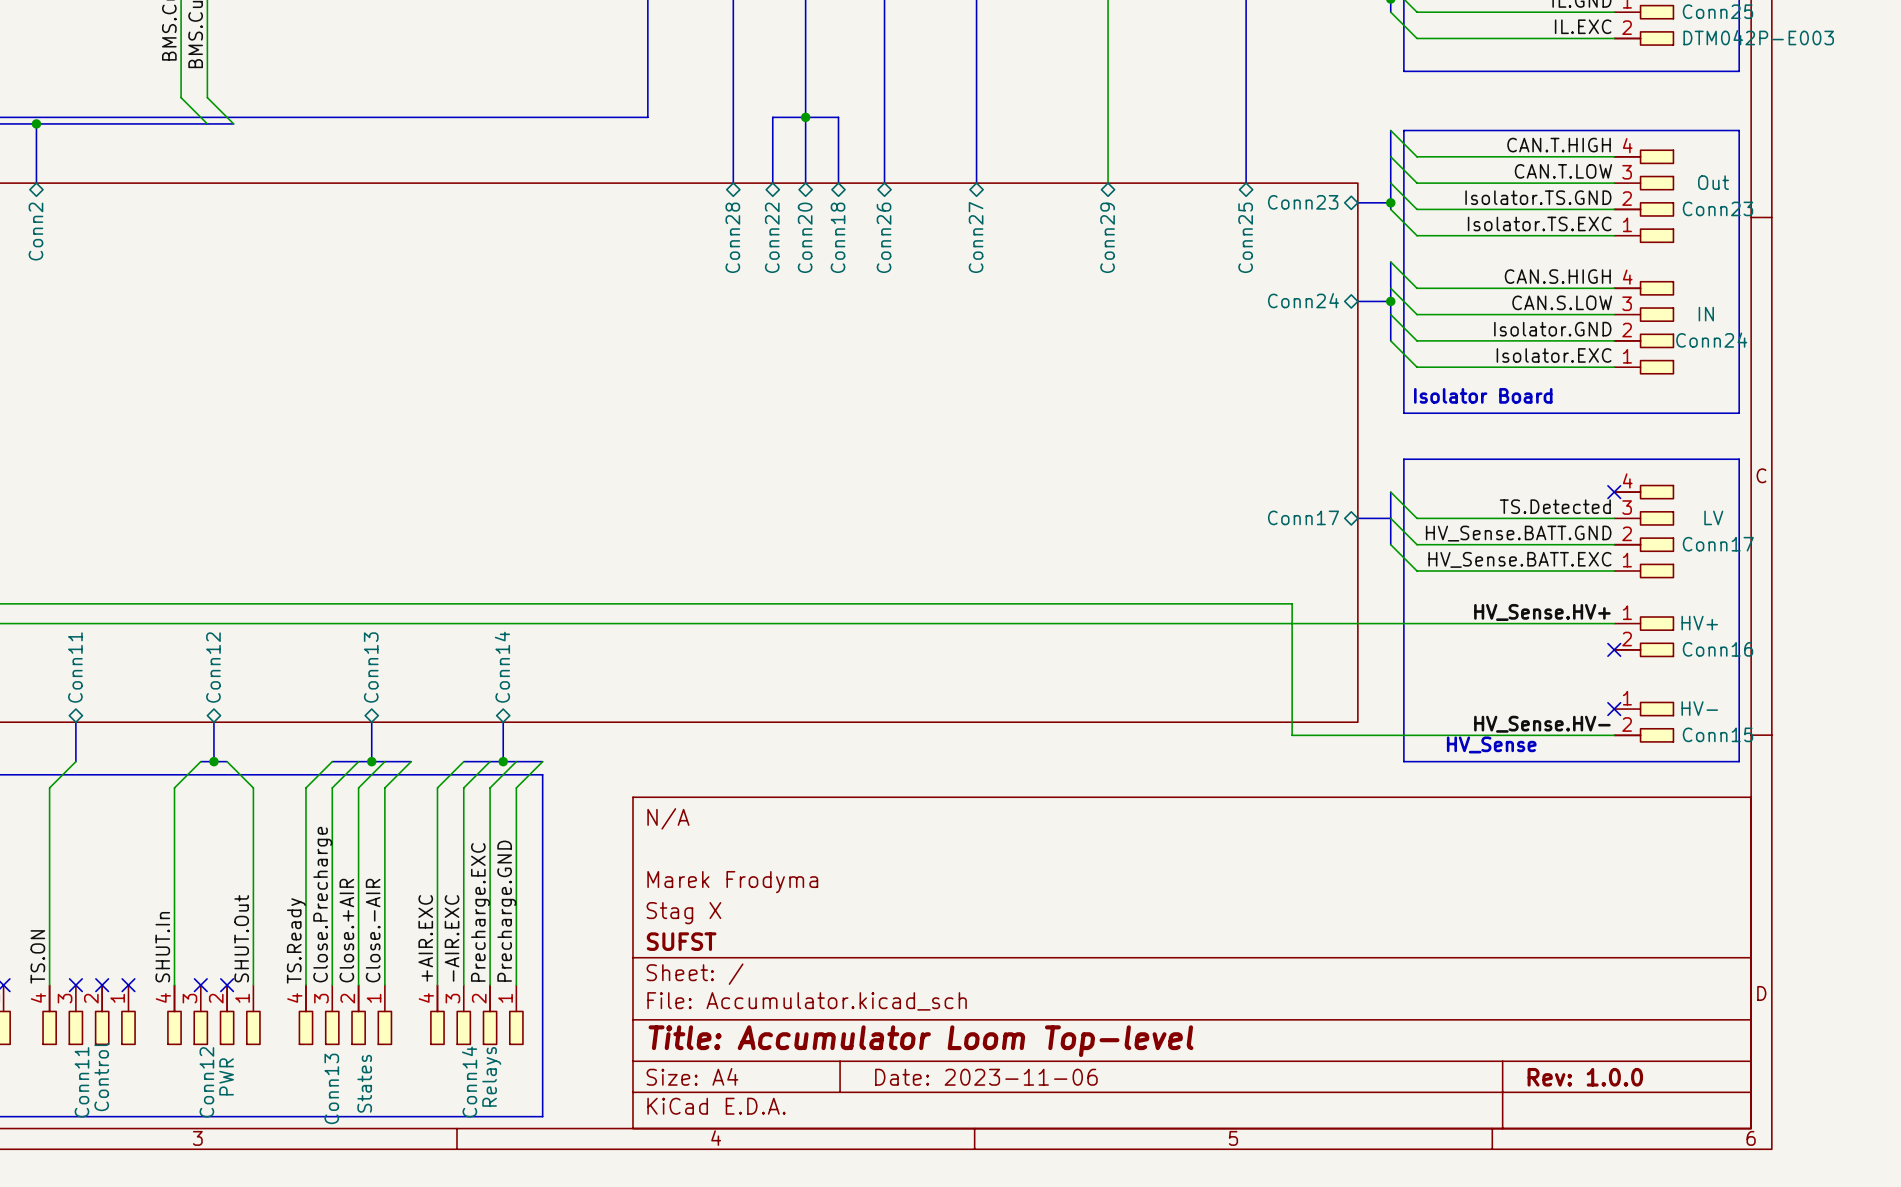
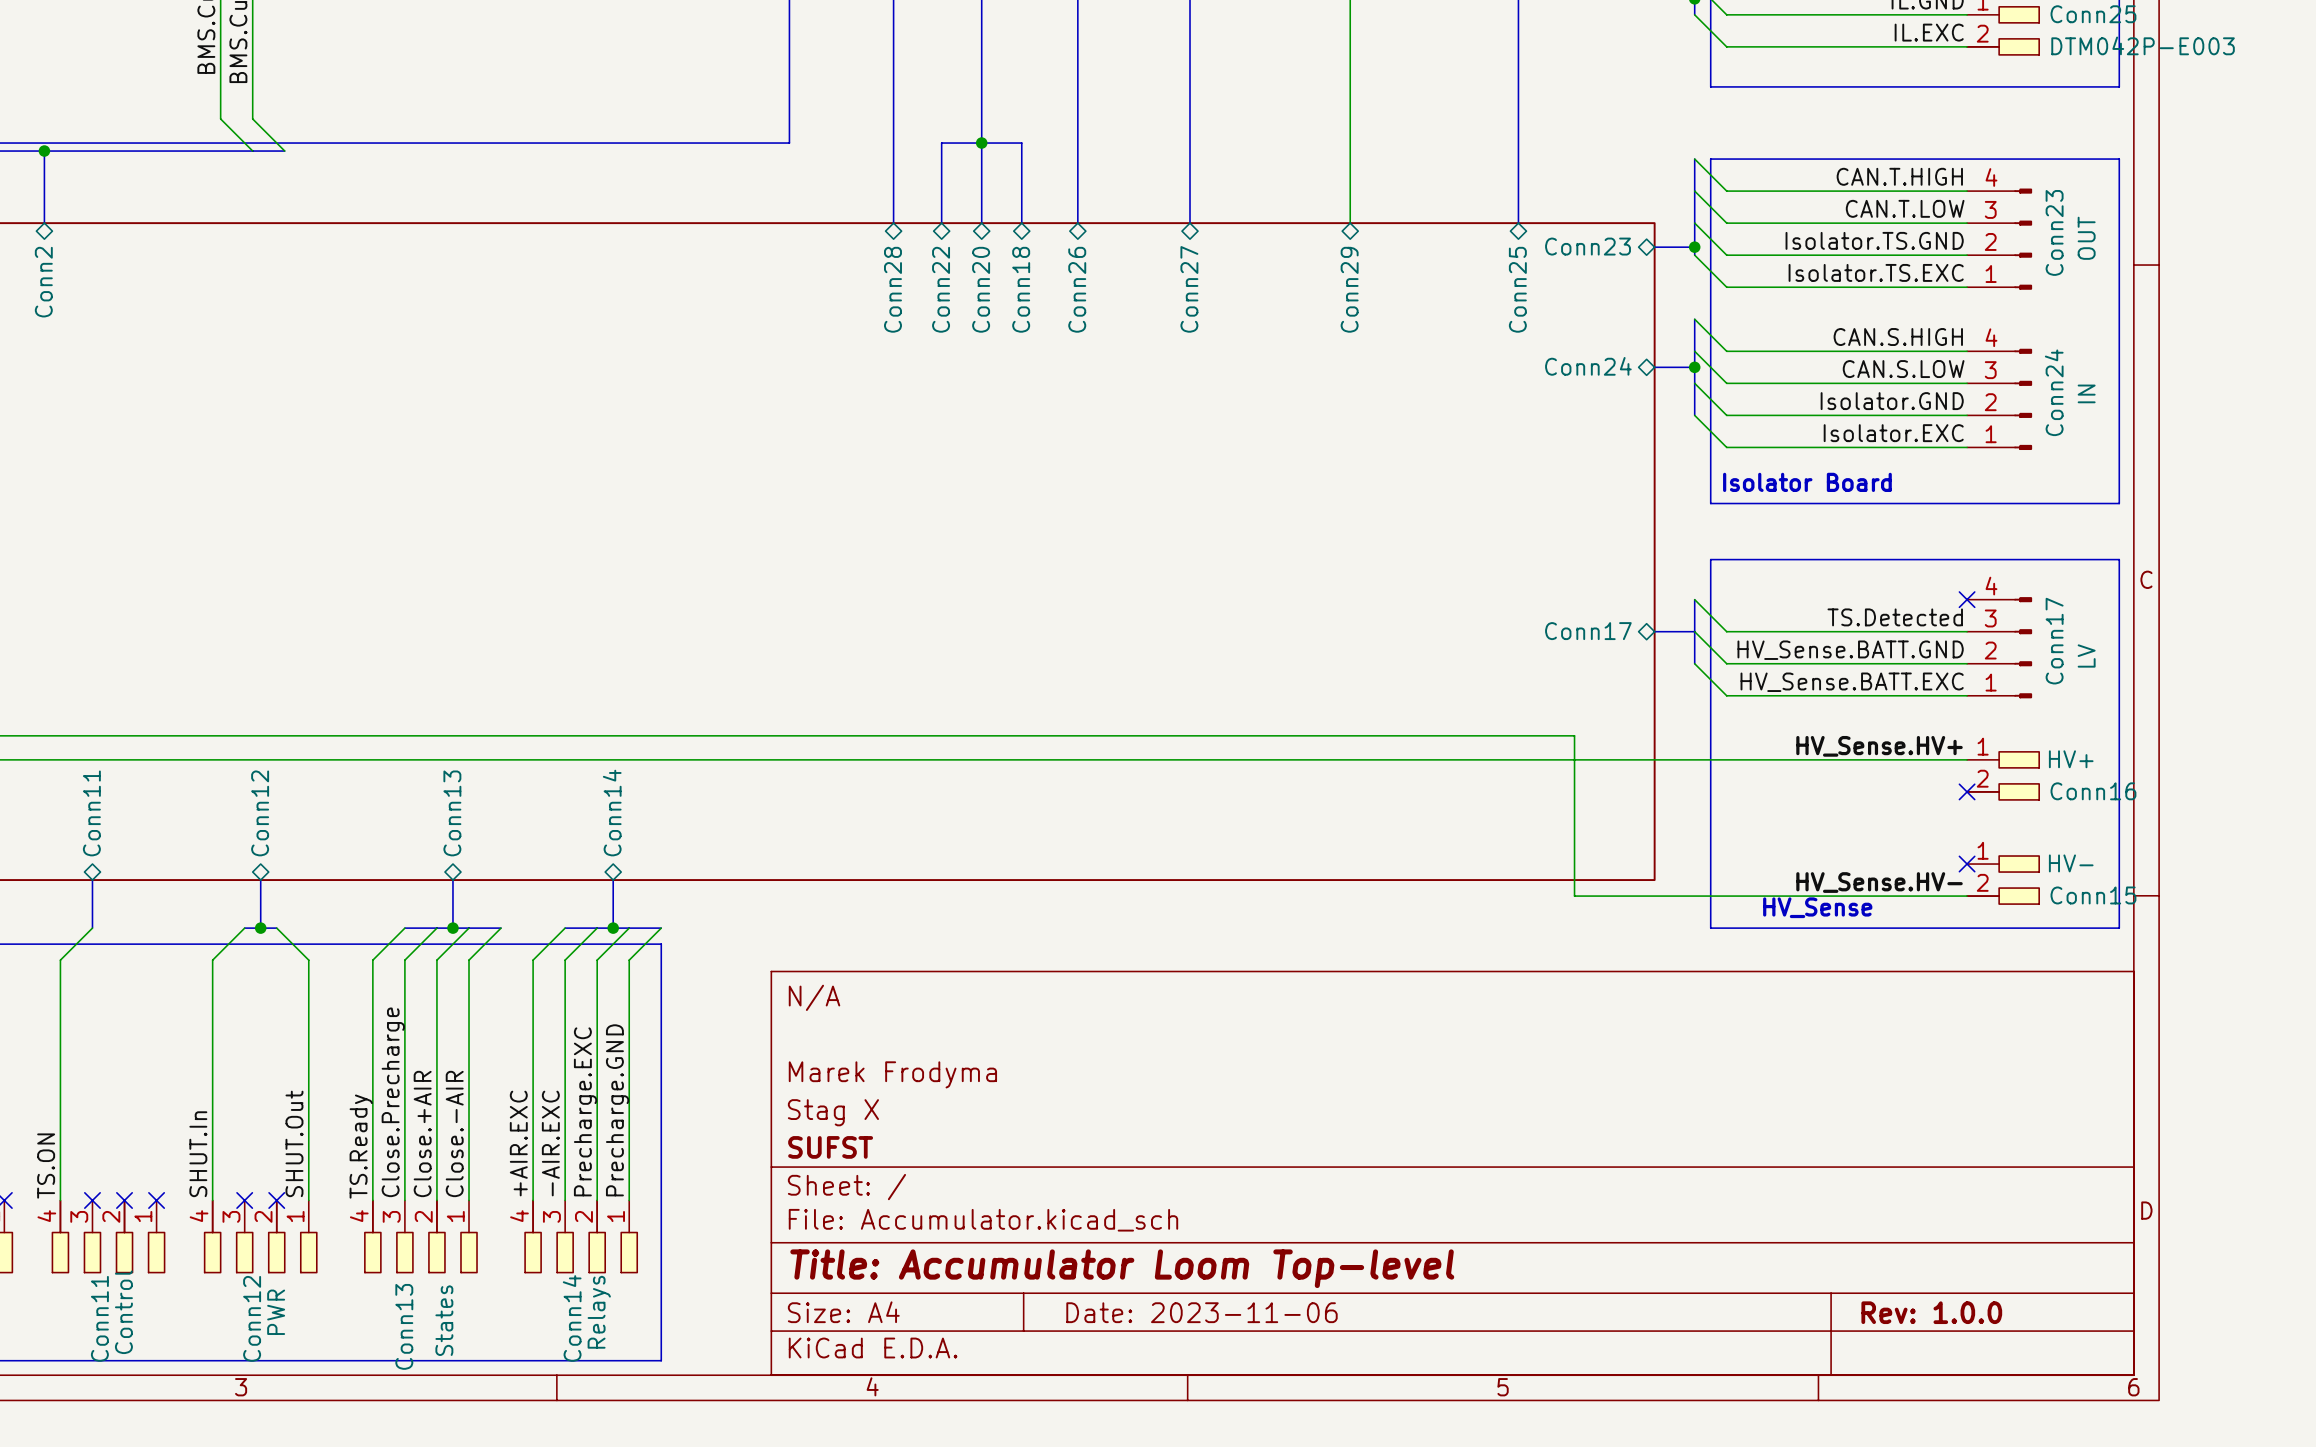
Conn23 symbol: [1614, 150, 1674, 243] -> [1967, 188, 2033, 290]
Conn23 text: Out (1713, 182) -> none
Conn23 value: none -> OUT (2086, 238)
Conn23 name position: Conn23 (1717, 208) -> Conn23 (2054, 232)
Conn24 symbol: [1614, 281, 1674, 374] -> [1967, 348, 2033, 451]
Conn24 text: IN (1706, 314) -> none
Conn24 value: none -> IN (2086, 393)
Conn24 name position: Conn24 (1711, 340) -> Conn24 (2054, 392)
Conn17 symbol: [1614, 485, 1674, 578] -> [1967, 597, 2033, 699]
Conn17 text: LV (1713, 517) -> none
Conn17 value: none -> LV (2086, 655)
Conn17 name position: Conn17 (1718, 544) -> Conn17 (2054, 641)

